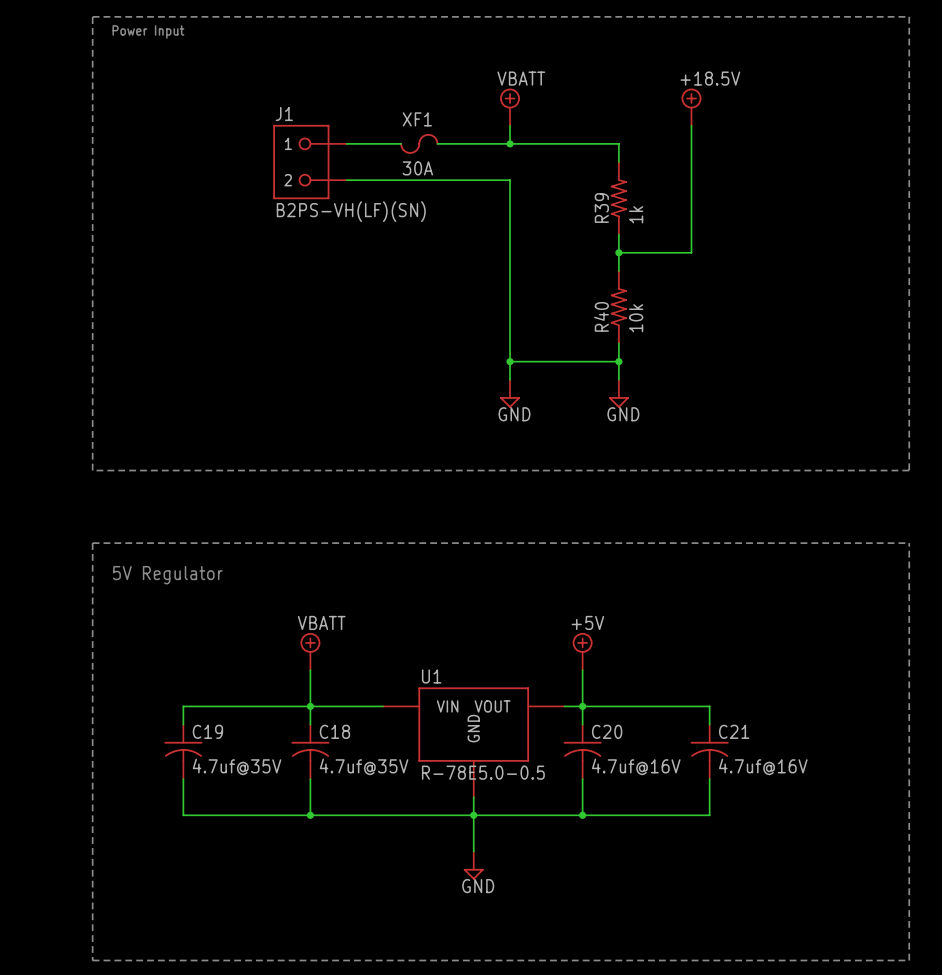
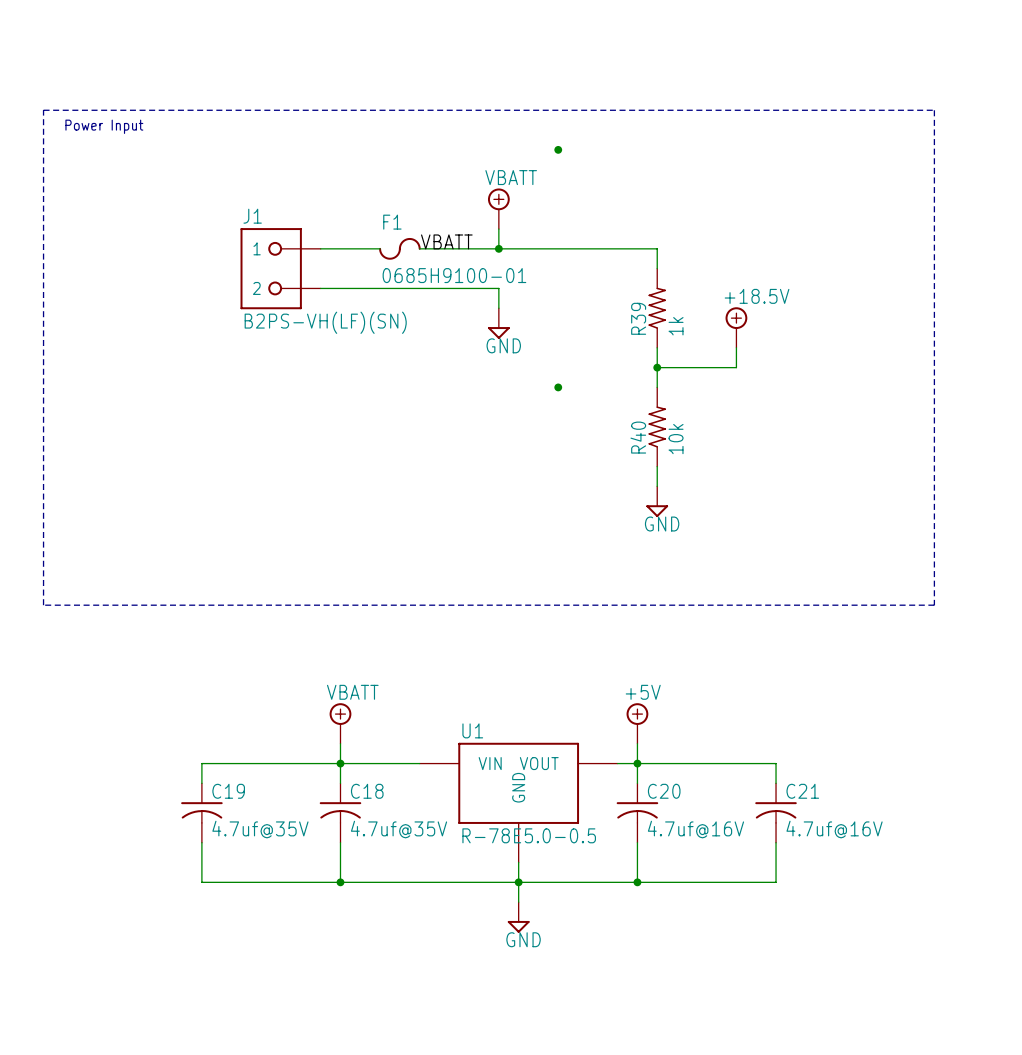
line: (92, 16) (909, 16) (909, 470) (92, 470) (92, 16) -> (43, 110) (934, 110) (934, 605) (43, 605) (43, 110)
text position: Power Input (148, 31) -> Power Input (104, 126)
power symbol position: VBATT (510, 107) -> VBATT (498, 208)
power symbol: +18.5V (691, 107) -> none
wire: (510, 125) (510, 143) -> (498, 229) (498, 248)
wire: (691, 125) (691, 252) (618, 252) -> none
wire: (346, 143) (401, 143) -> (320, 248) (380, 248)
XF1: 30A (419, 143) -> none
wire: (437, 143) (618, 143) (618, 162) -> none
J1 position: (309, 162) -> (280, 268)
wire: (346, 180) (510, 180) (510, 379) -> none
R39 position: (618, 198) -> (657, 308)
label: none -> VBATT (446, 241)
F1: none -> 0685H9100-01 (399, 248)
wire: none -> (419, 248) (657, 248) (657, 268)
junction: none -> (498, 248)
wire: (618, 234) (618, 270) -> none
junction: (618, 252) -> none
wire: none -> (320, 288) (498, 288) (498, 308)
power symbol: none -> GND (498, 323)
power symbol: none -> +18.5V (736, 327)
R40 position: (618, 307) -> (657, 427)
wire: none -> (736, 347) (736, 367) (657, 367)
wire: (618, 343) (618, 379) -> (657, 347) (657, 387)
wire: (510, 361) (618, 361) -> none
junction position: (618, 361) -> (657, 367)
power symbol: GND (510, 393) -> none
power symbol: GND (618, 393) -> none
wire: none -> (657, 466) (657, 486)
power symbol: none -> GND (657, 501)
line: (92, 543) (92, 960) (909, 960) (909, 543) (92, 543) -> none
text: 5V Regulator (167, 575) -> none
power symbol position: VBATT (310, 651) -> VBATT (340, 723)
power symbol position: +5V (582, 651) -> +5V (637, 723)
power symbol position: GND (473, 865) -> GND (518, 917)

